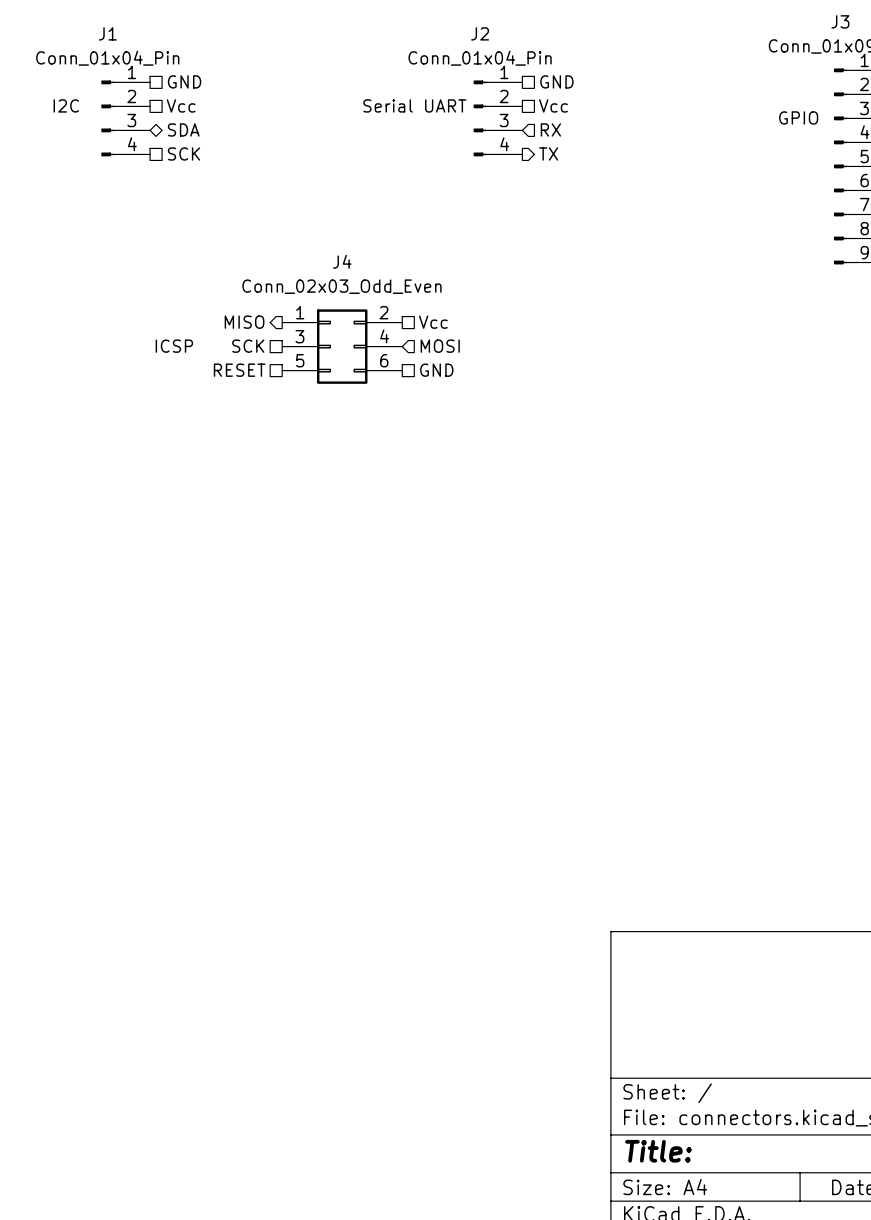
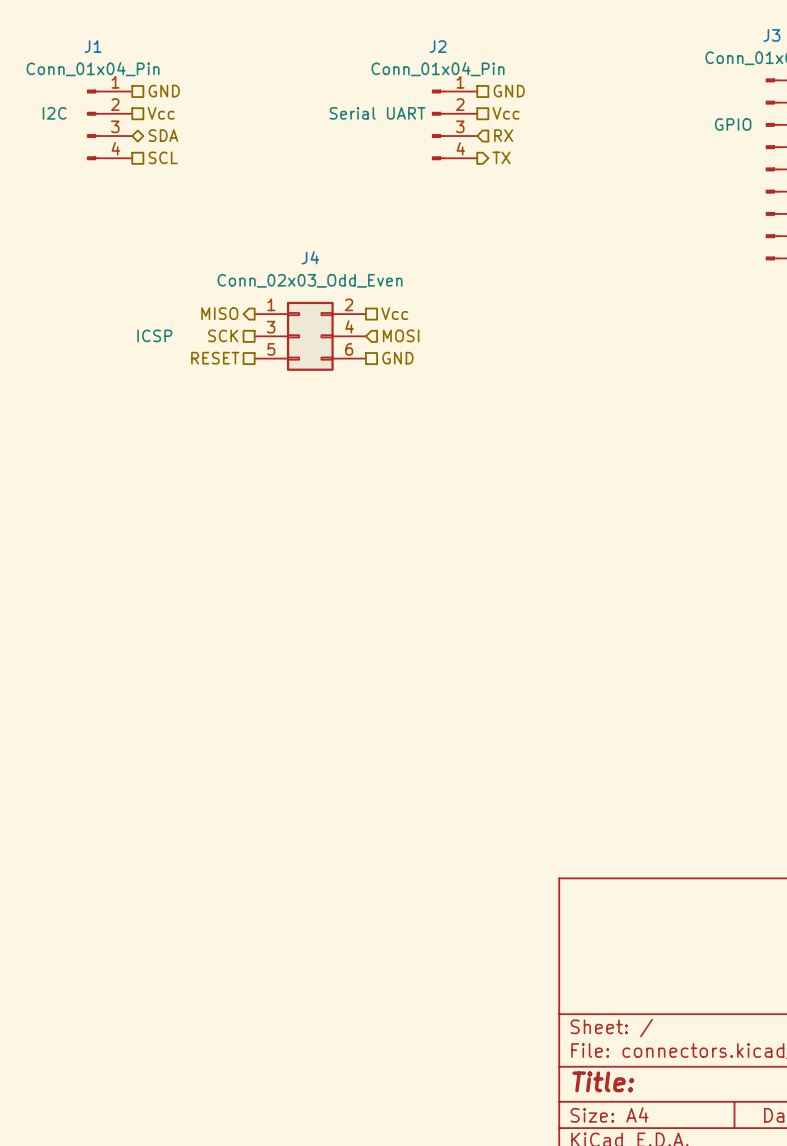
hierarchical label: SCK (184, 153) -> SCL (163, 157)

